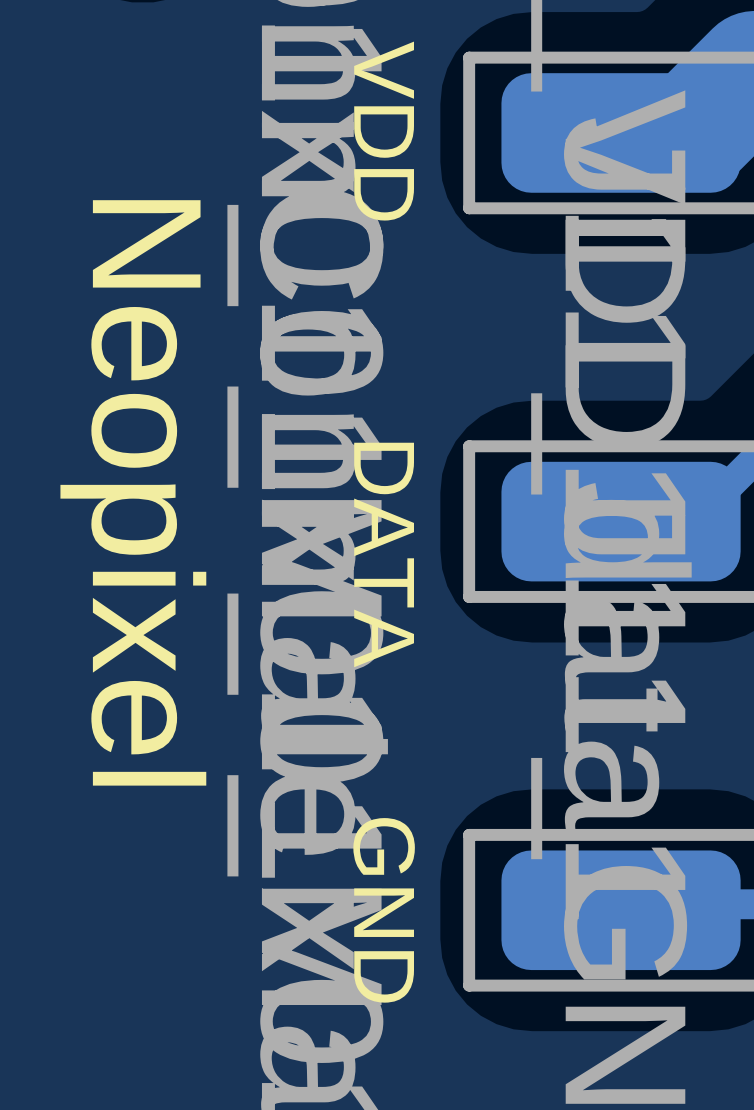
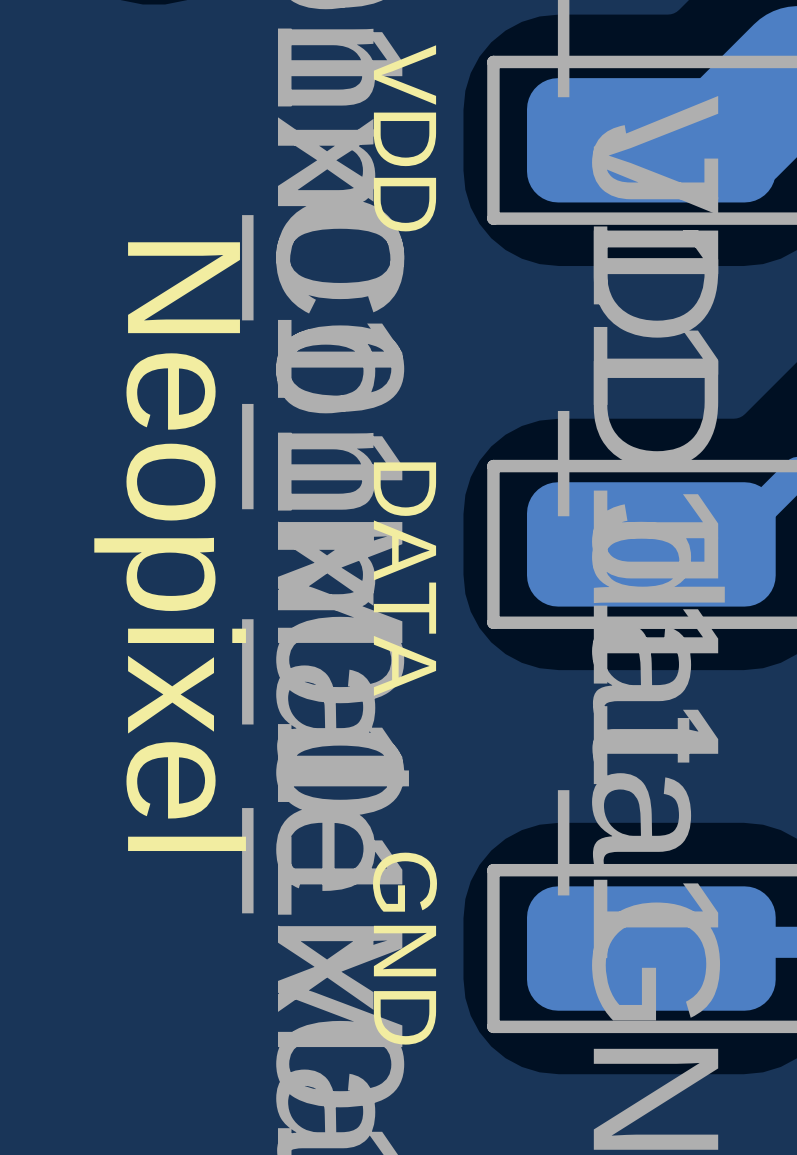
text position: Neopixel (133, 492) -> Neopixel (170, 546)

